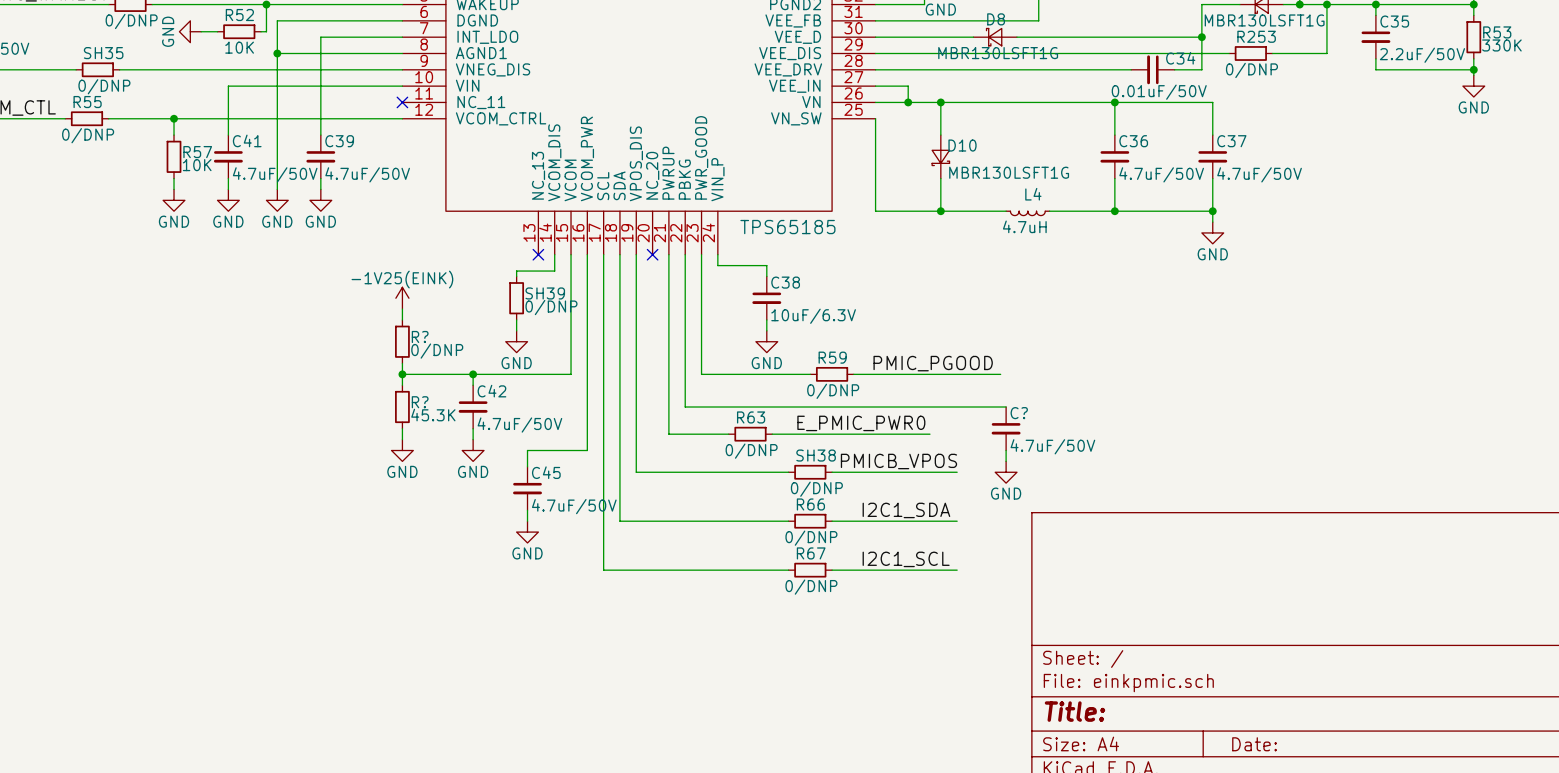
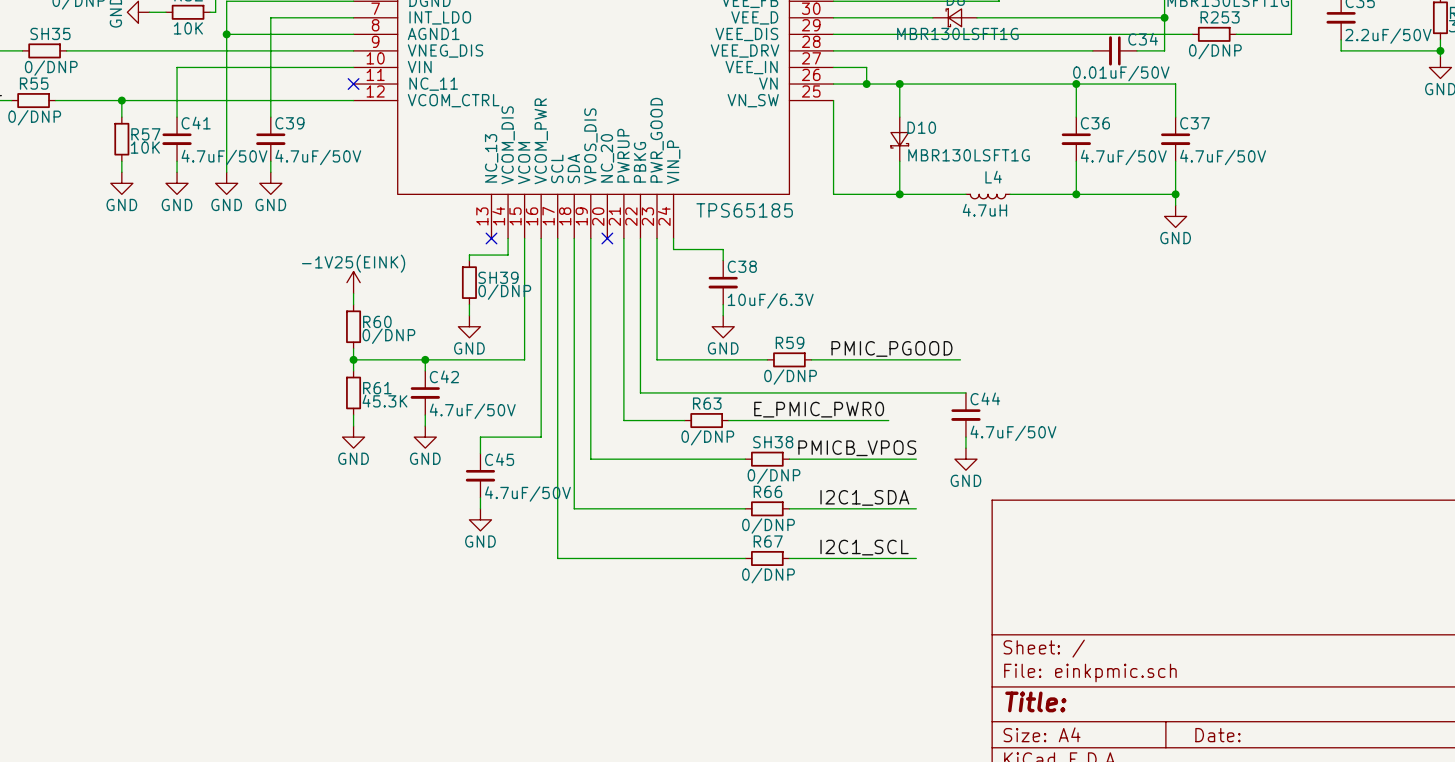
R? name: R? (420, 336) -> R60 (377, 321)
R? name: R? (420, 402) -> R61 (377, 388)
C? name: C? (1019, 413) -> C44 (985, 398)

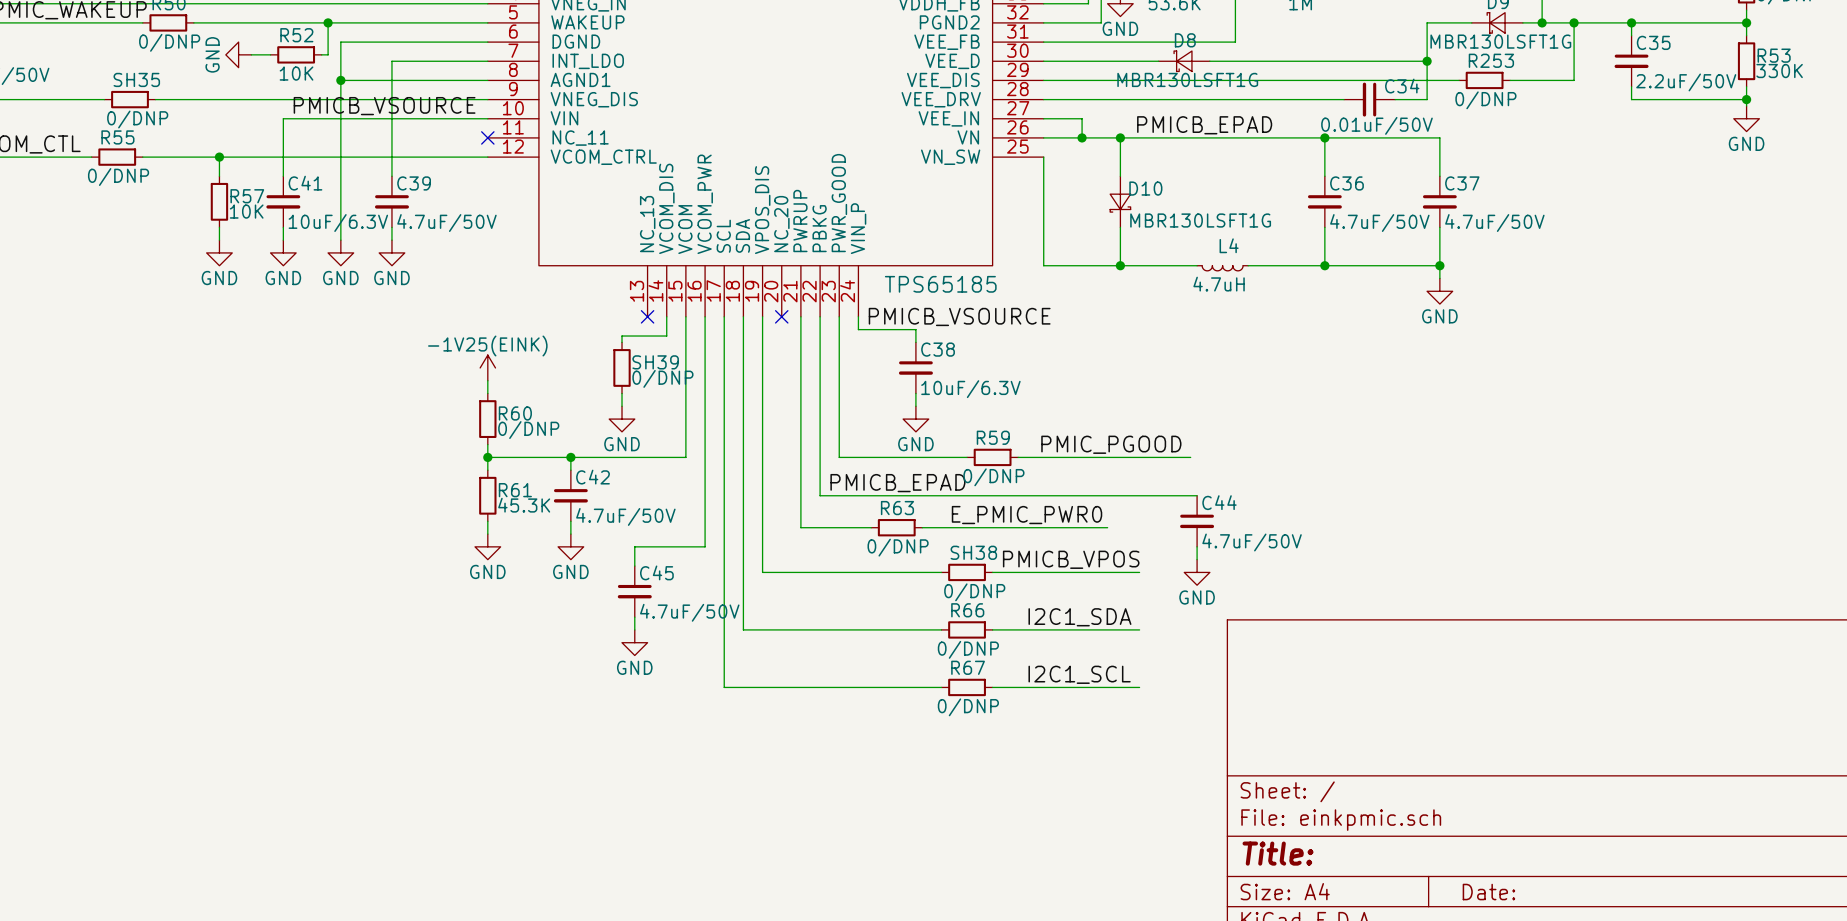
label: none -> PMICB_VSOURCE (384, 106)
label: none -> PMICB_EPAD (1204, 125)
C41 value: 4.7uF/50V (224, 157) -> 10uF/6.3V (338, 223)
label: none -> PMICB_VSOURCE (959, 316)
label: none -> PMICB_EPAD (897, 483)

